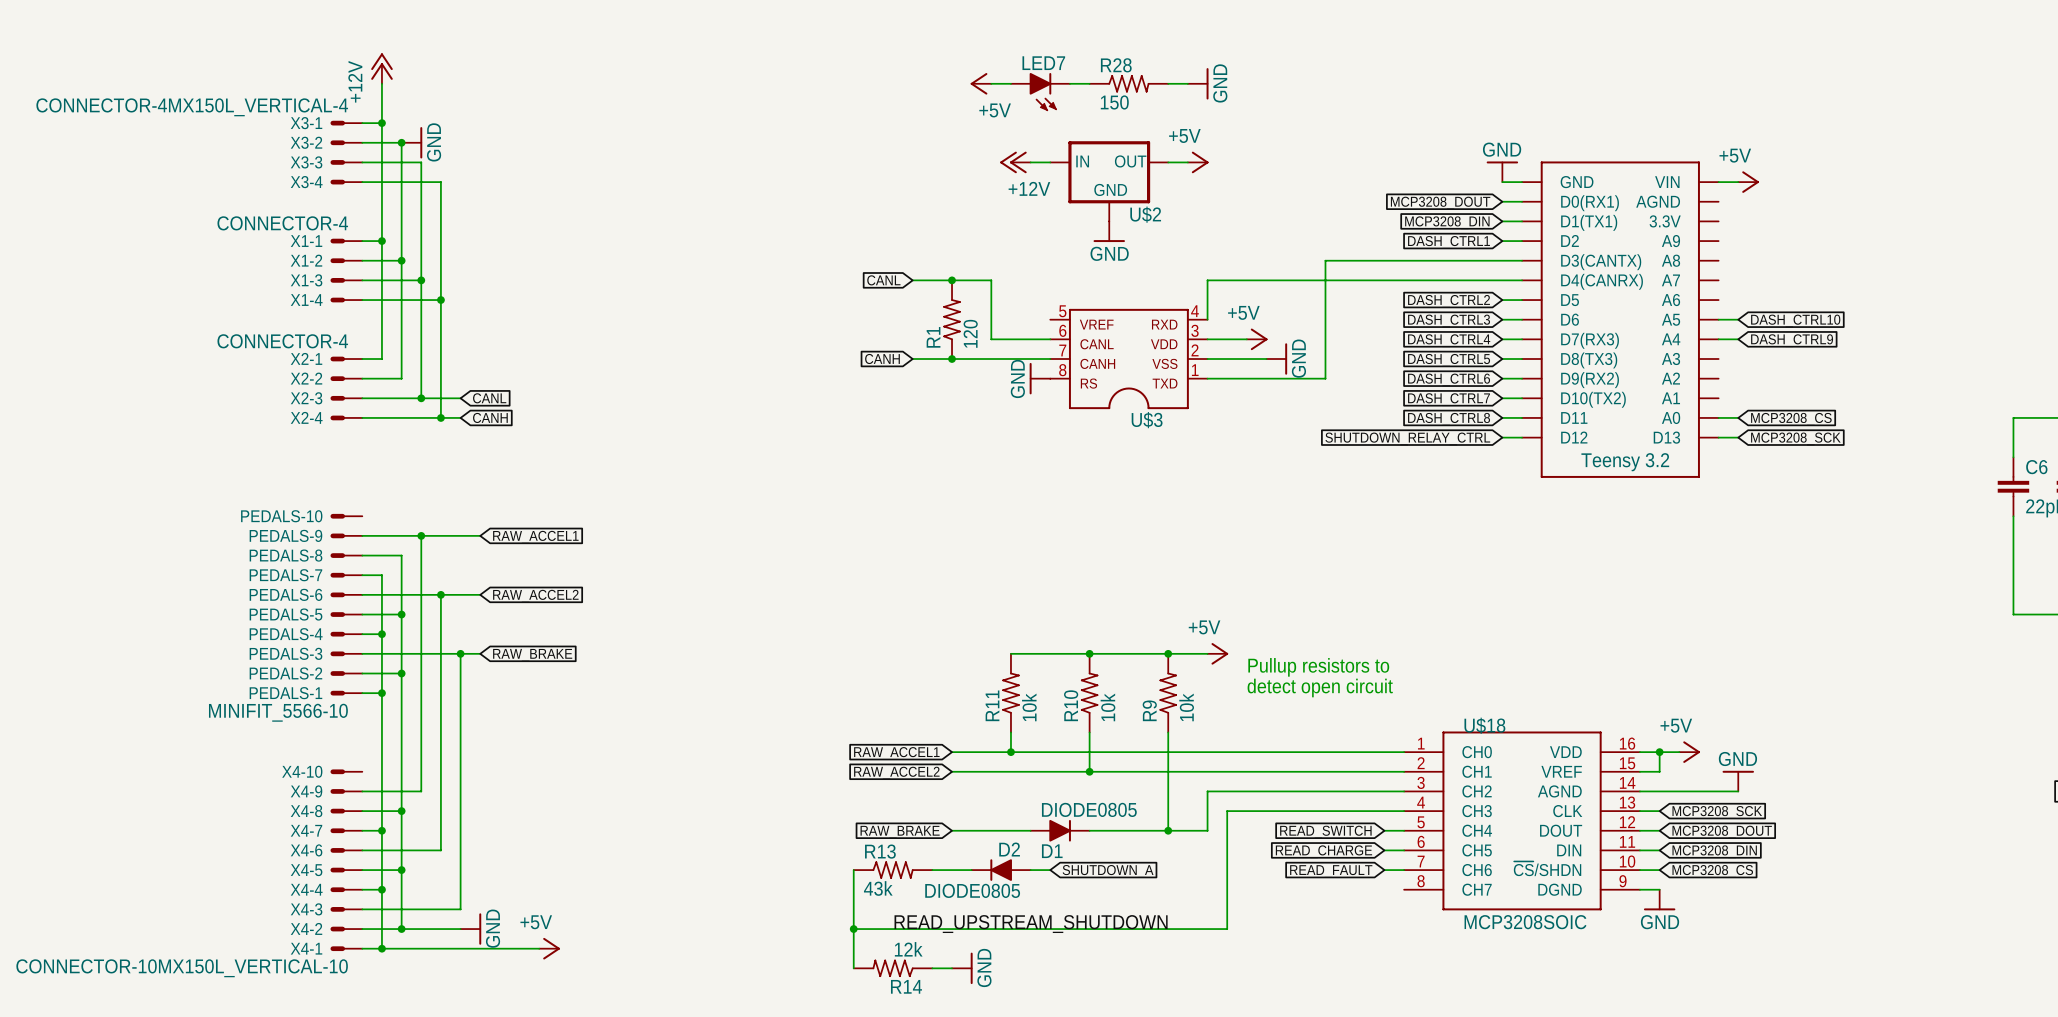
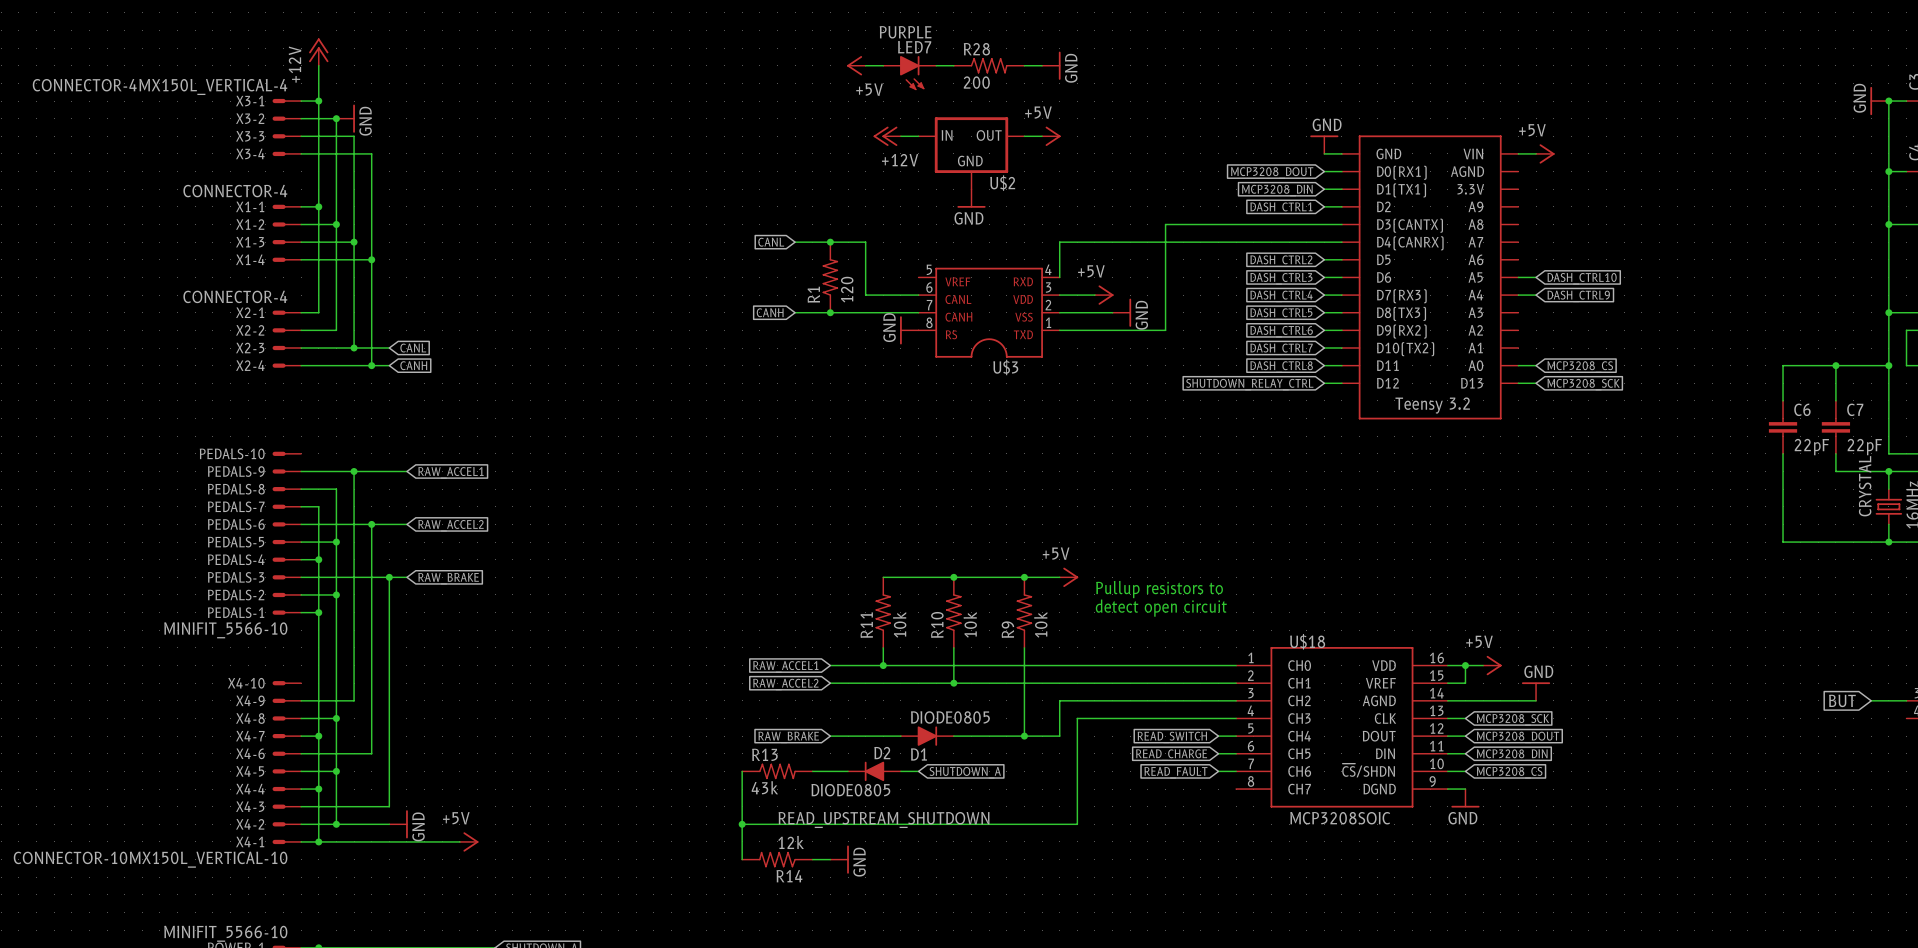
LED7 value: none -> PURPLE (905, 32)
R28 value: 150 (1114, 102) -> 200 (976, 82)

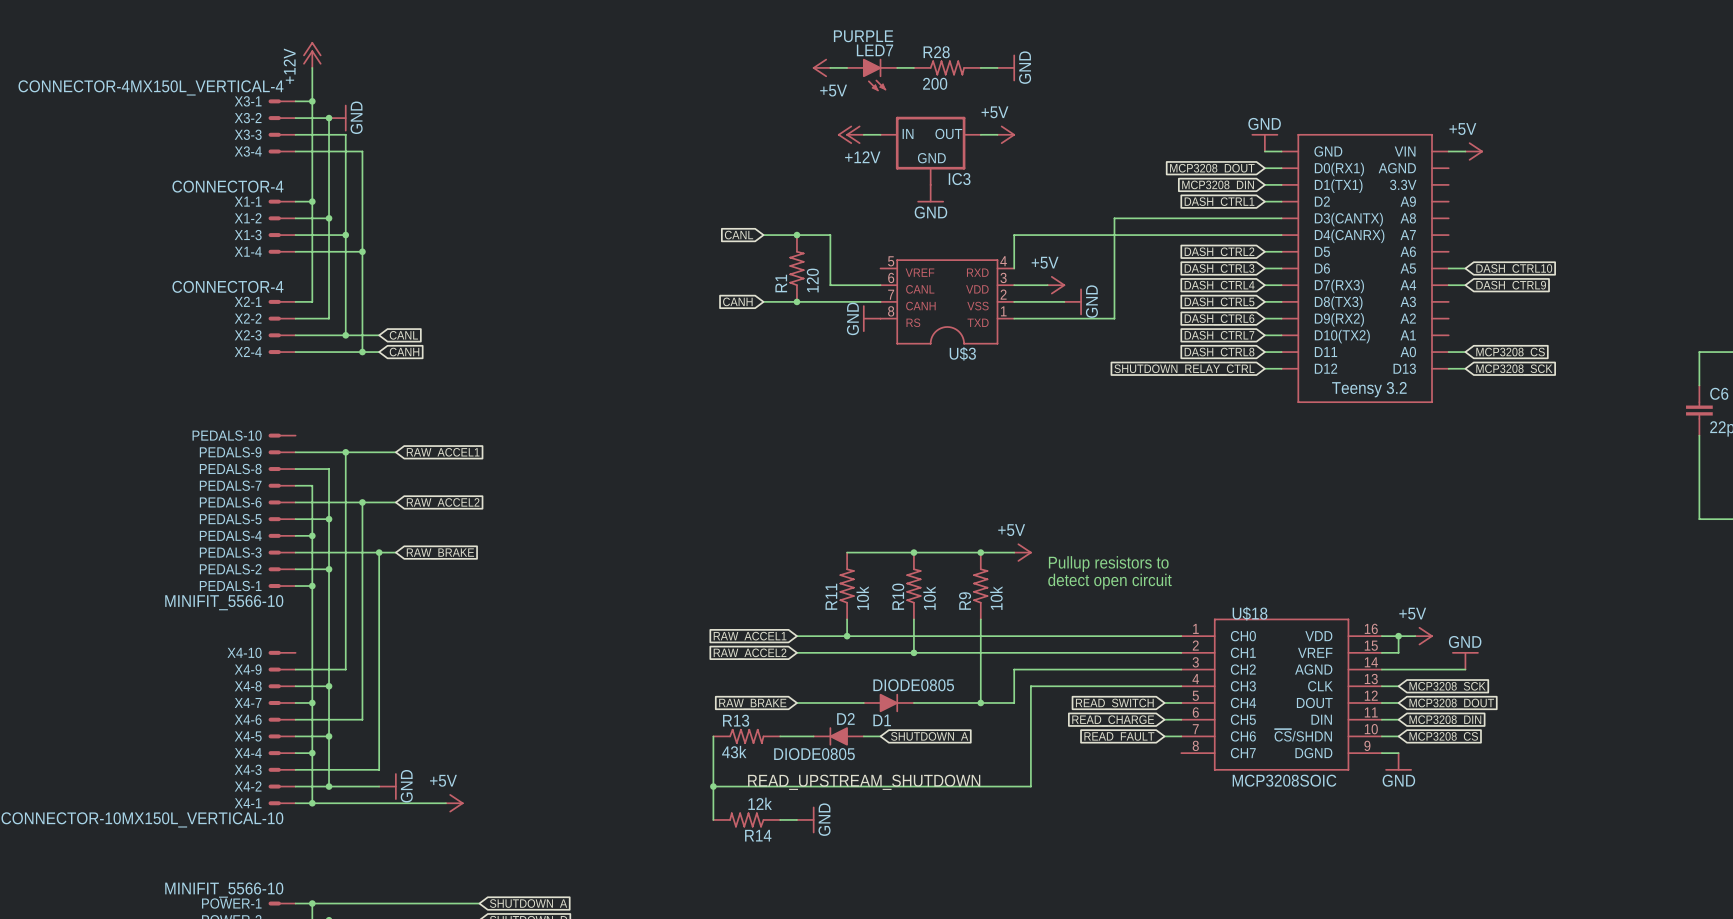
U$2 name: U$2 (1002, 183) -> IC3 (959, 179)

